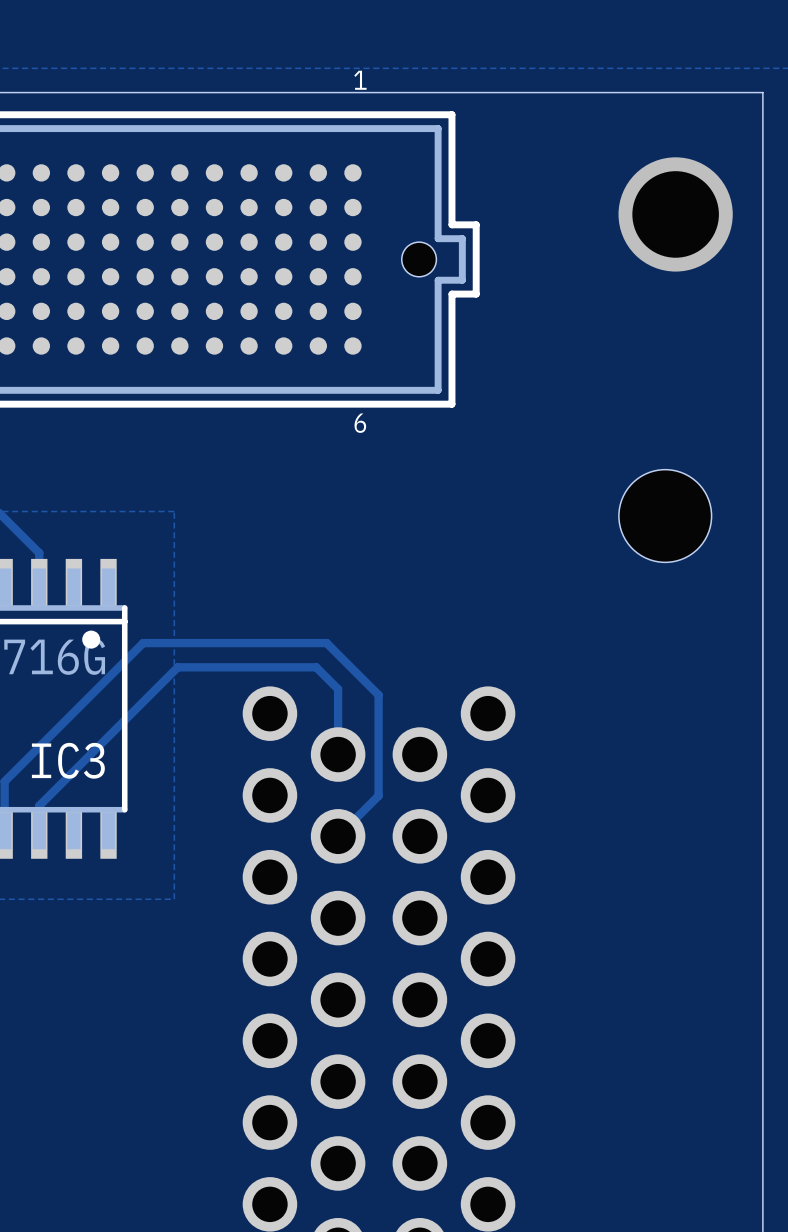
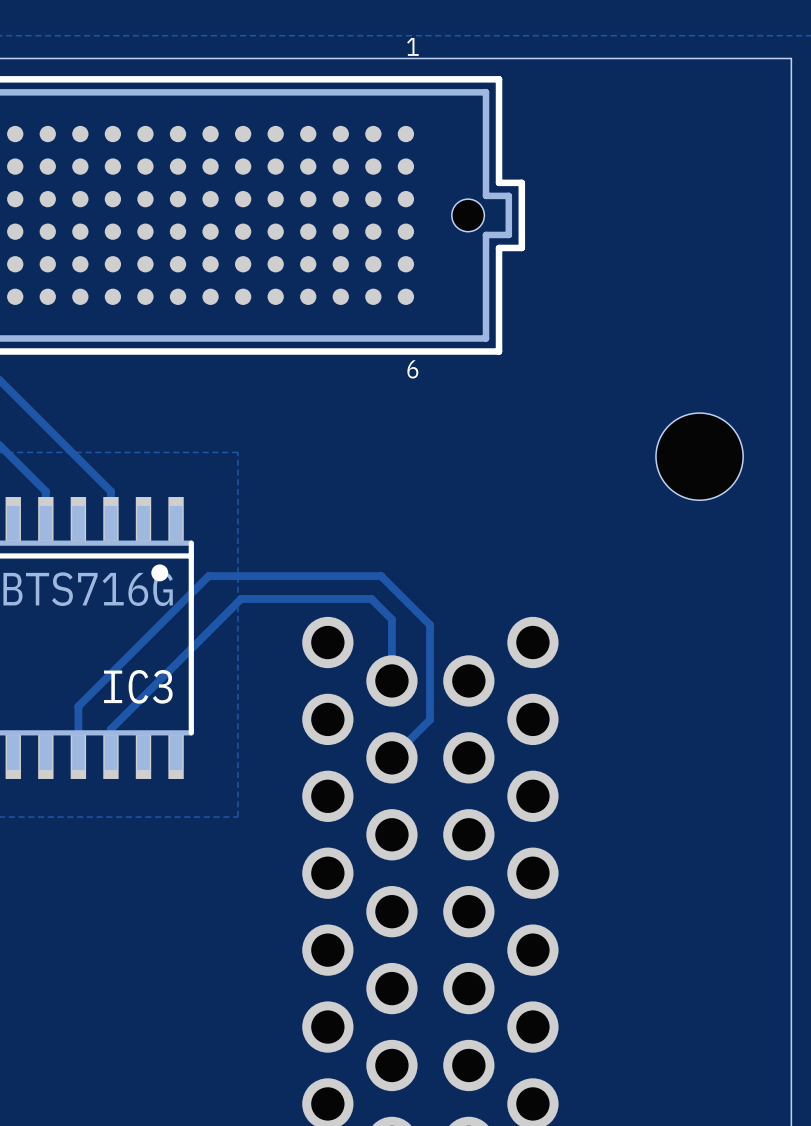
via: (675, 214) -> none

